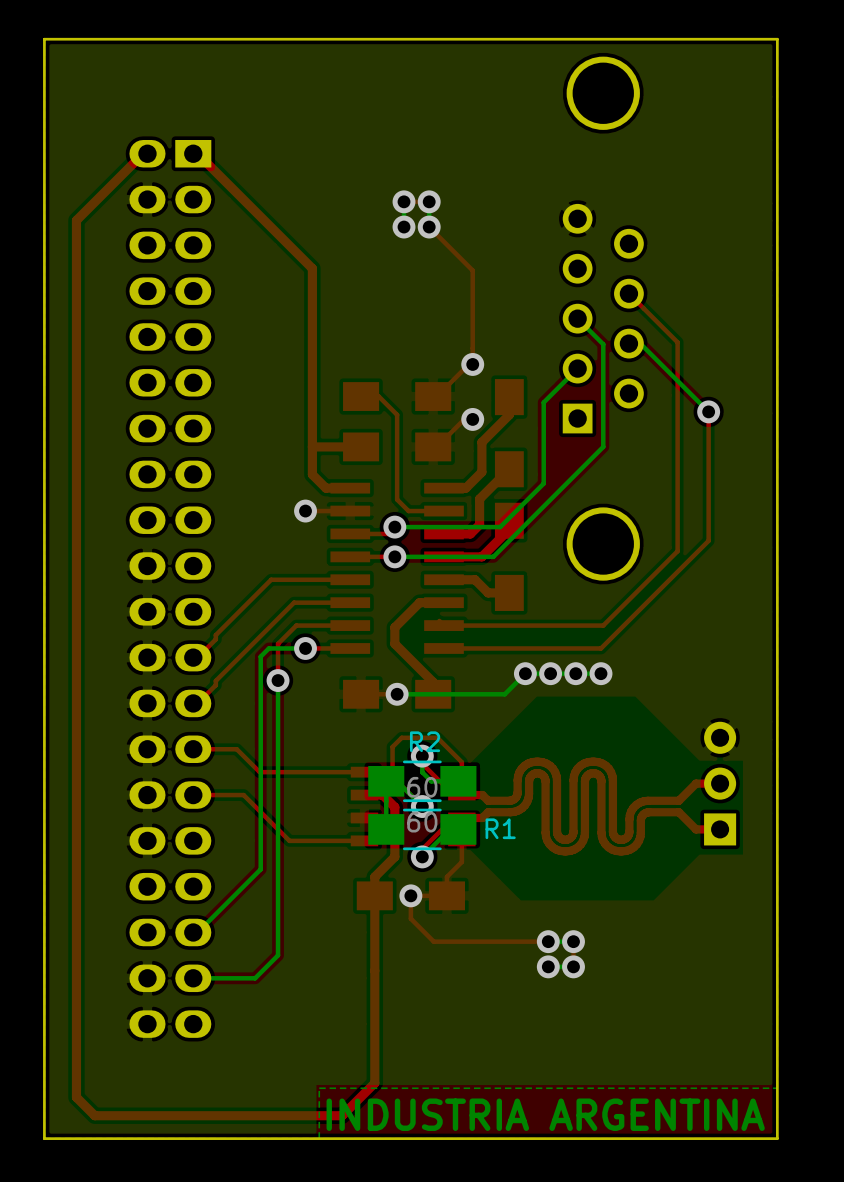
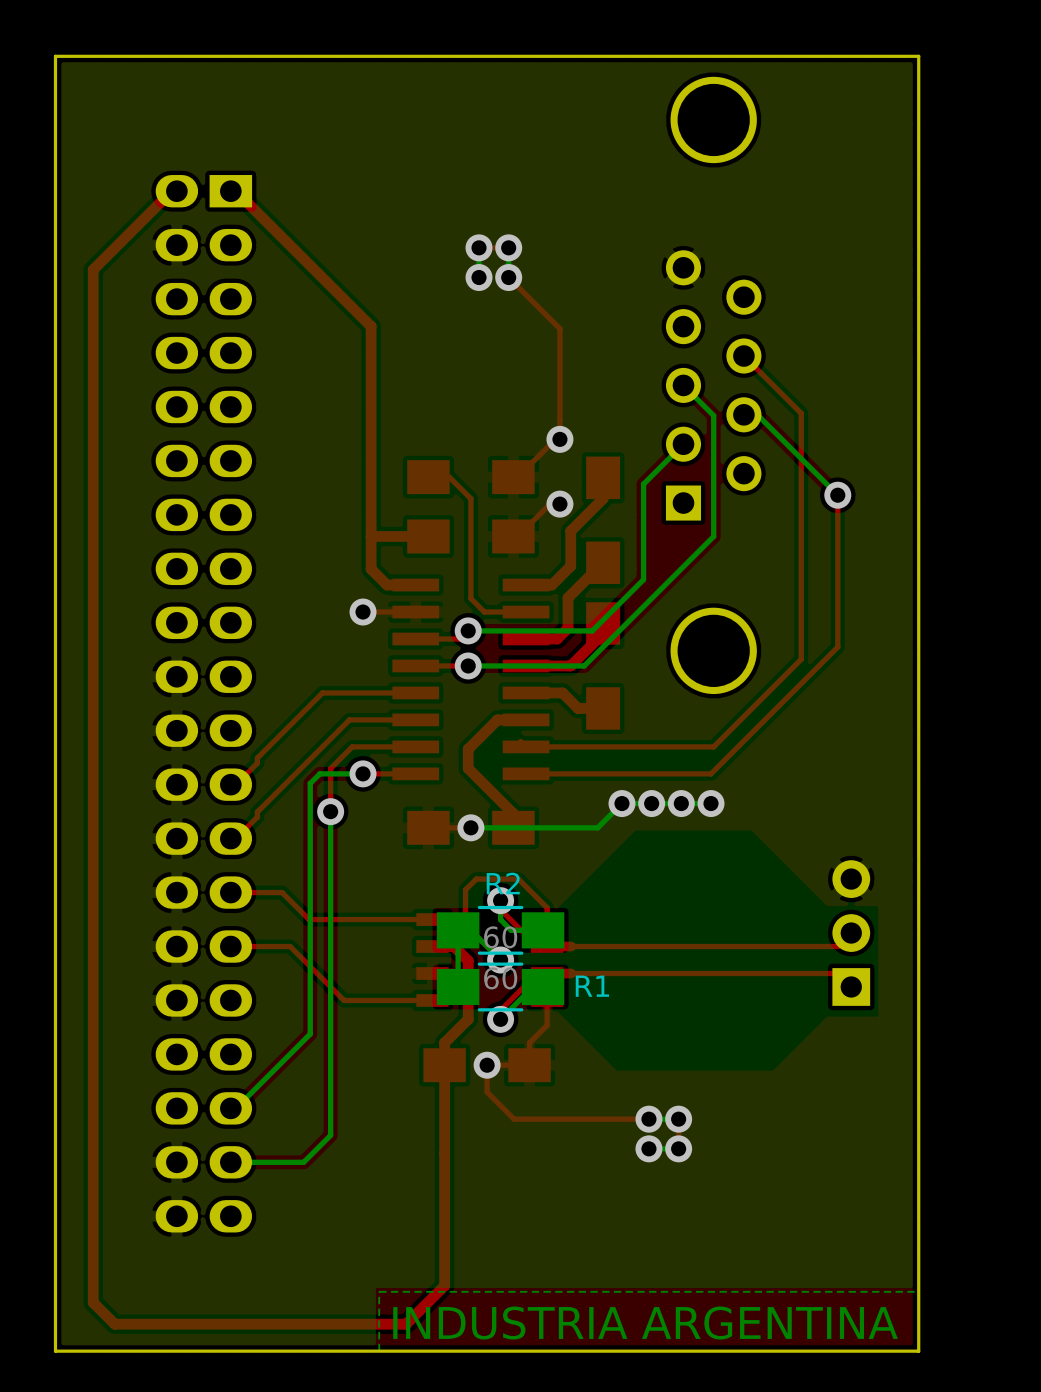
top track: (720, 783) (696, 783) (678, 800) (639, 802) (633, 807) (629, 815) (628, 835) (621, 839) (616, 838) (613, 833) (612, 776) (608, 768) (598, 762) (584, 763) (575, 772) (573, 780) (573, 833) (567, 839) (560, 838) (557, 833) (556, 776) (552, 768) (546, 763) (532, 762) (521, 768) (518, 776) (517, 794) (512, 799) (488, 800) (482, 795) -> (851, 933) (837, 946) (571, 946)
top track: (482, 817) (488, 812) (514, 811) (522, 808) (528, 797) (529, 777) (533, 773) (539, 773) (545, 779) (545, 832) (547, 840) (552, 847) (559, 850) (574, 849) (580, 844) (584, 836) (585, 779) (588, 774) (593, 773) (598, 774) (601, 779) (601, 836) (605, 844) (611, 849) (626, 850) (636, 844) (640, 836) (641, 818) (647, 812) (678, 812) (696, 829) (720, 829) -> (571, 973) (837, 973)

